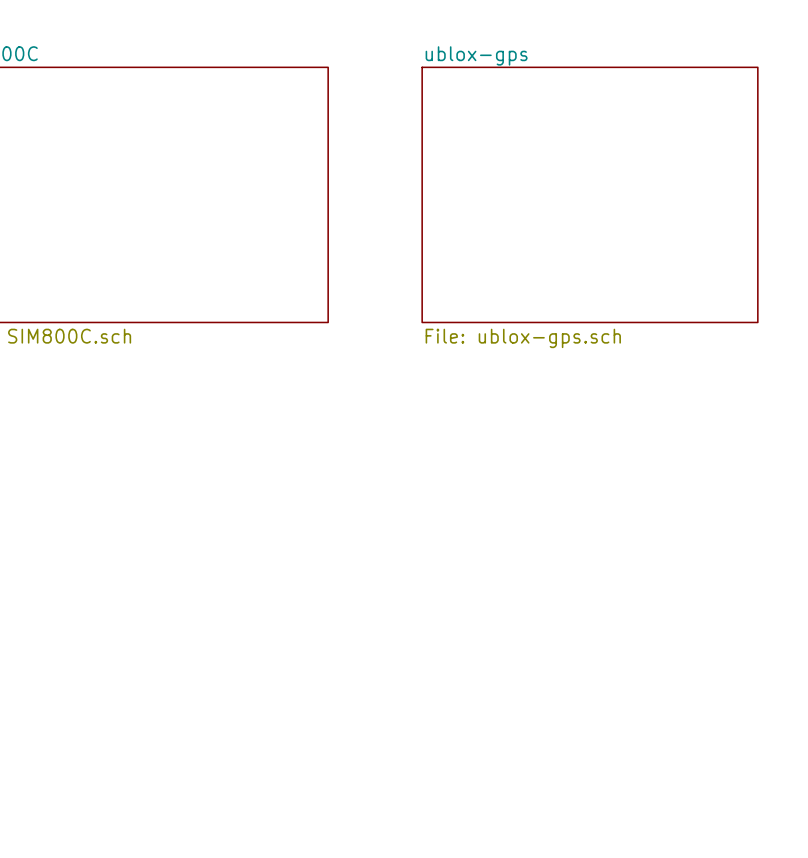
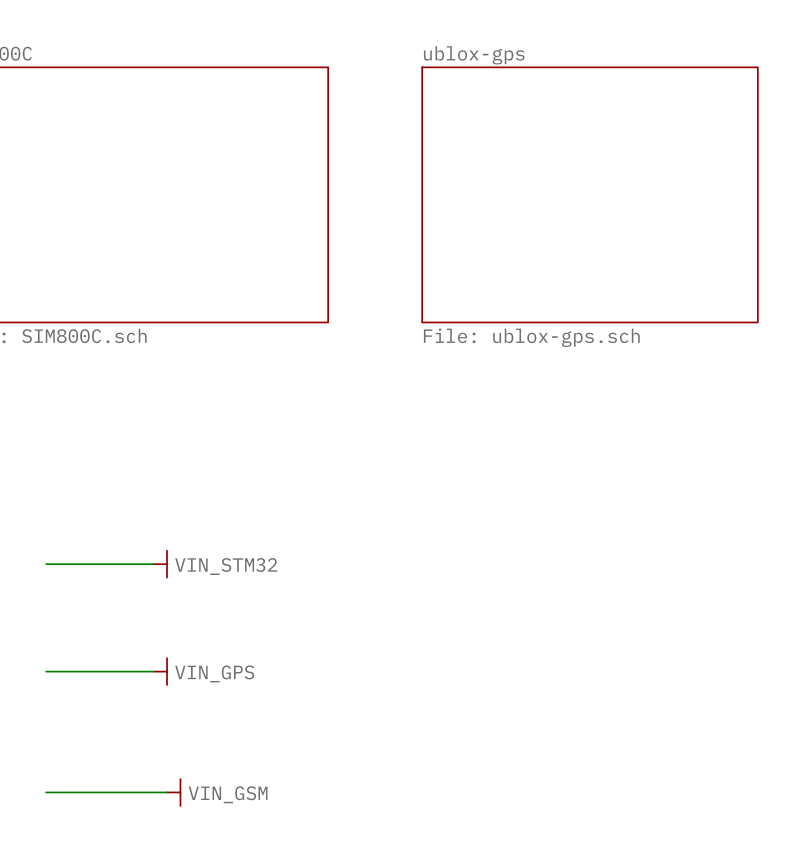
wire: none -> (46, 564) (153, 564)
power symbol: none -> VIN_STM32 (160, 564)
wire: none -> (46, 671) (153, 671)
power symbol: none -> VIN_GPS (160, 671)
wire: none -> (46, 792) (167, 792)
power symbol: none -> VIN_GSM (173, 792)

